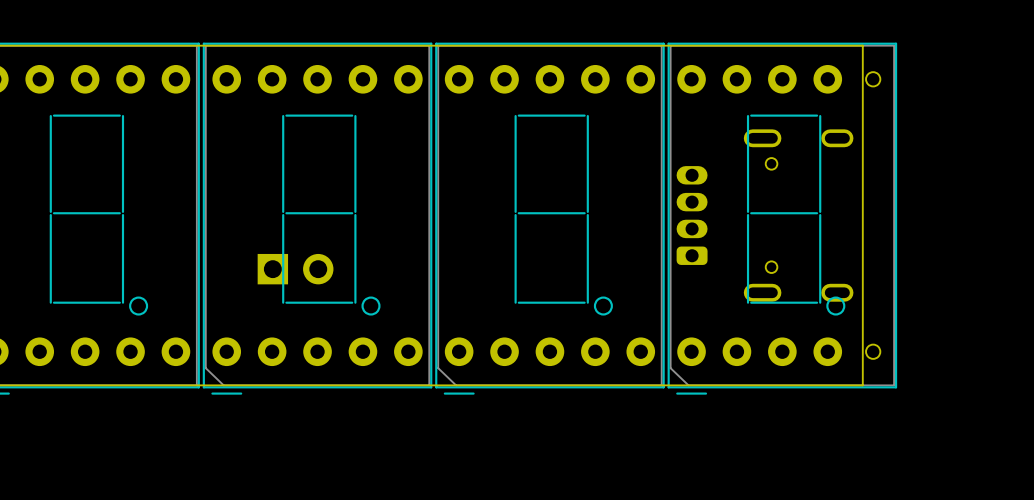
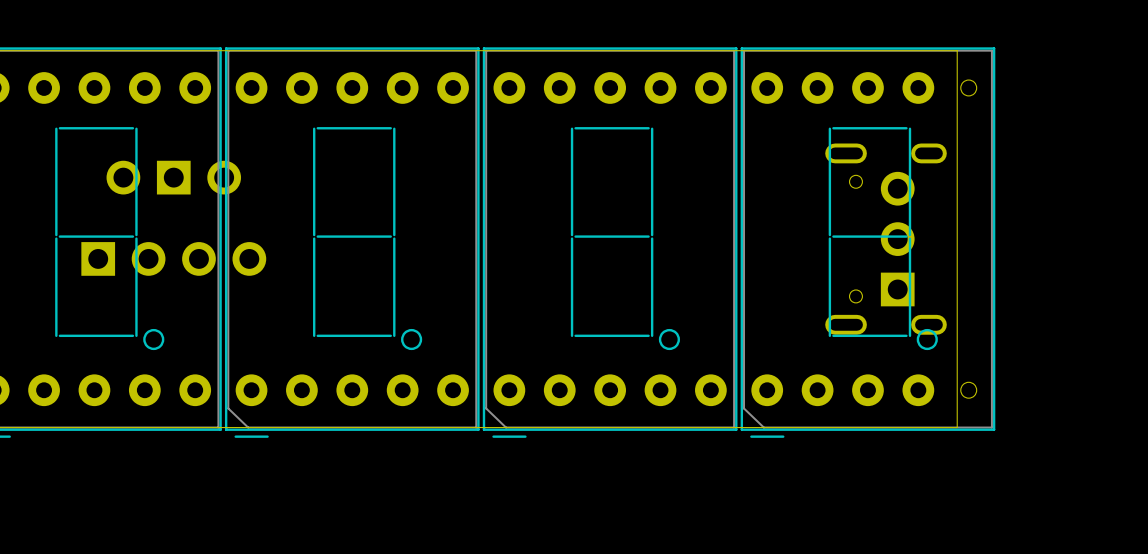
part: none -> (173, 177)
part: (692, 215) -> none
part: none -> (897, 239)
part: none -> (173, 258)
part: (295, 269) -> none

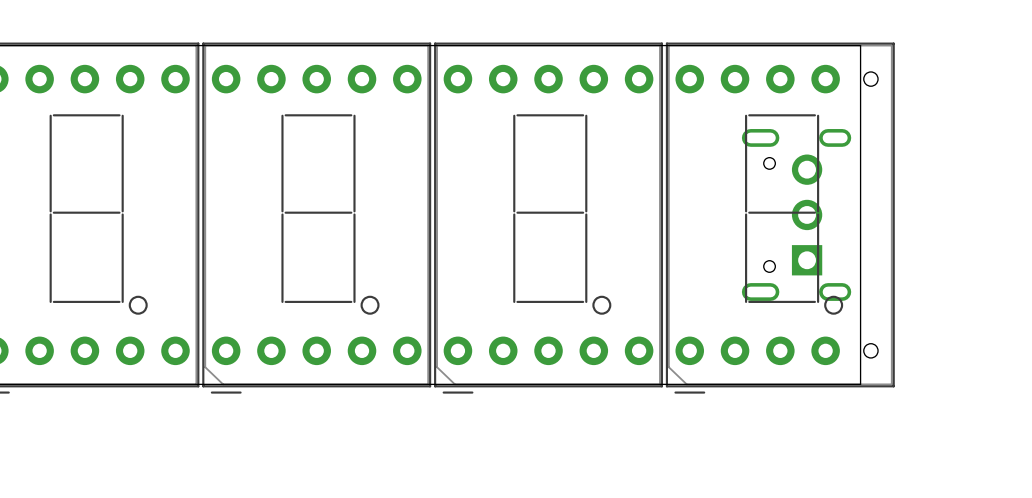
part: (173, 177) -> none
part: (173, 258) -> none

